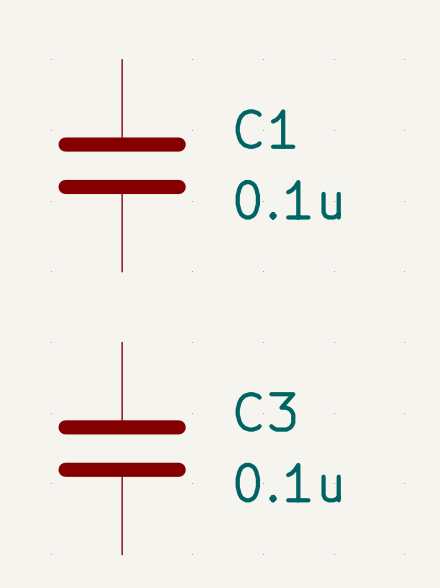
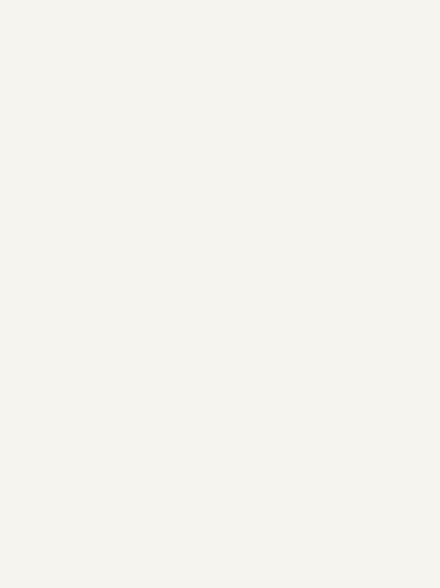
C1: 0.1u (122, 165) -> none
C3: 0.1u (122, 448) -> none

